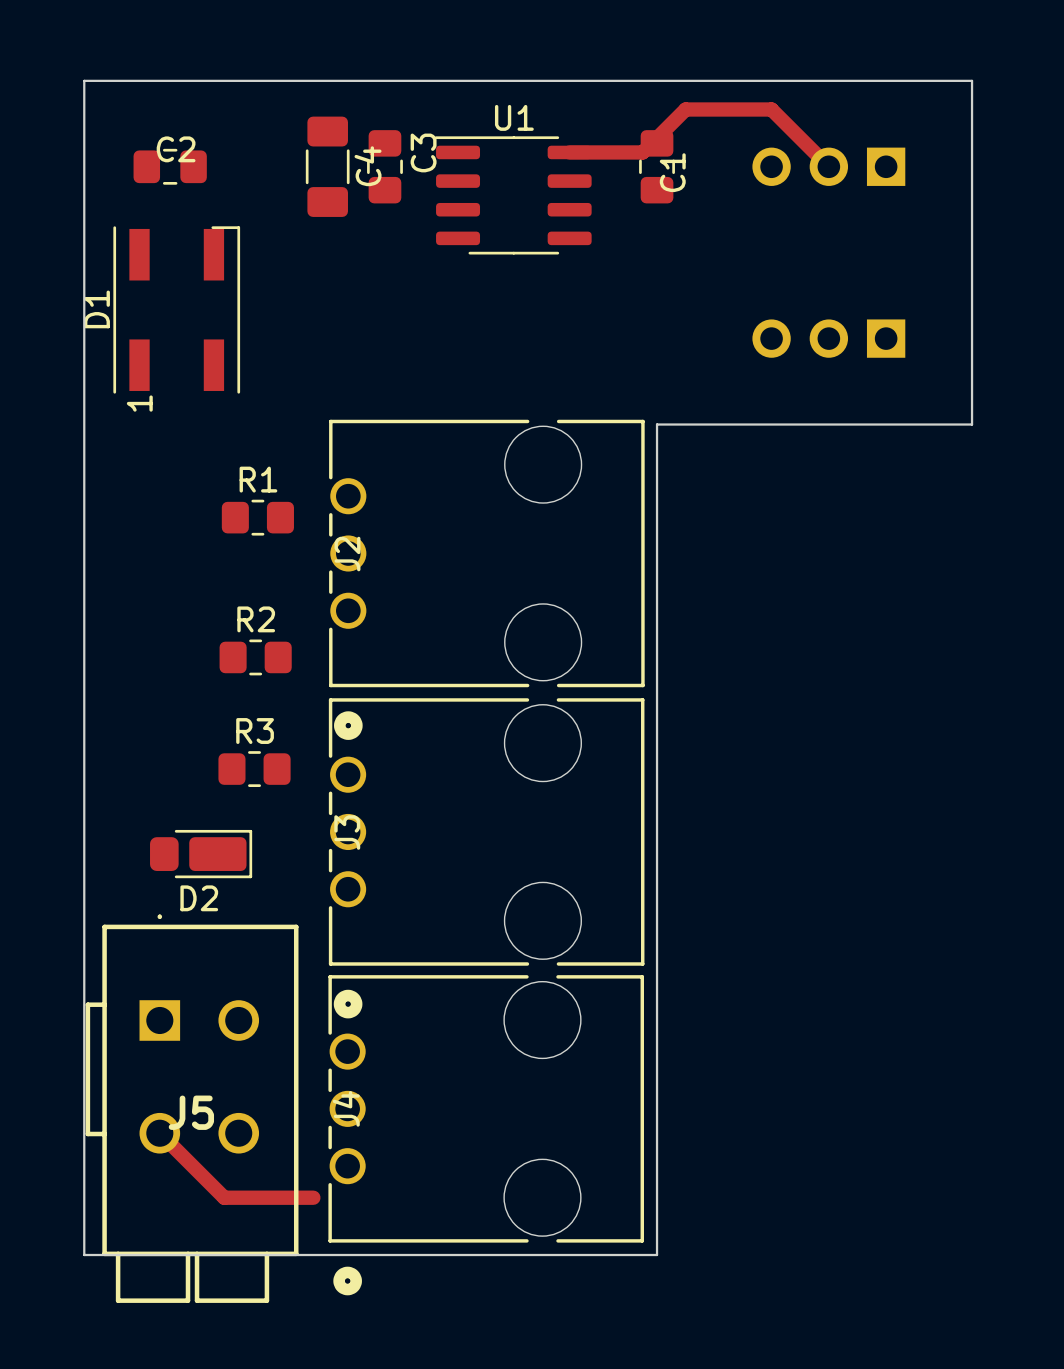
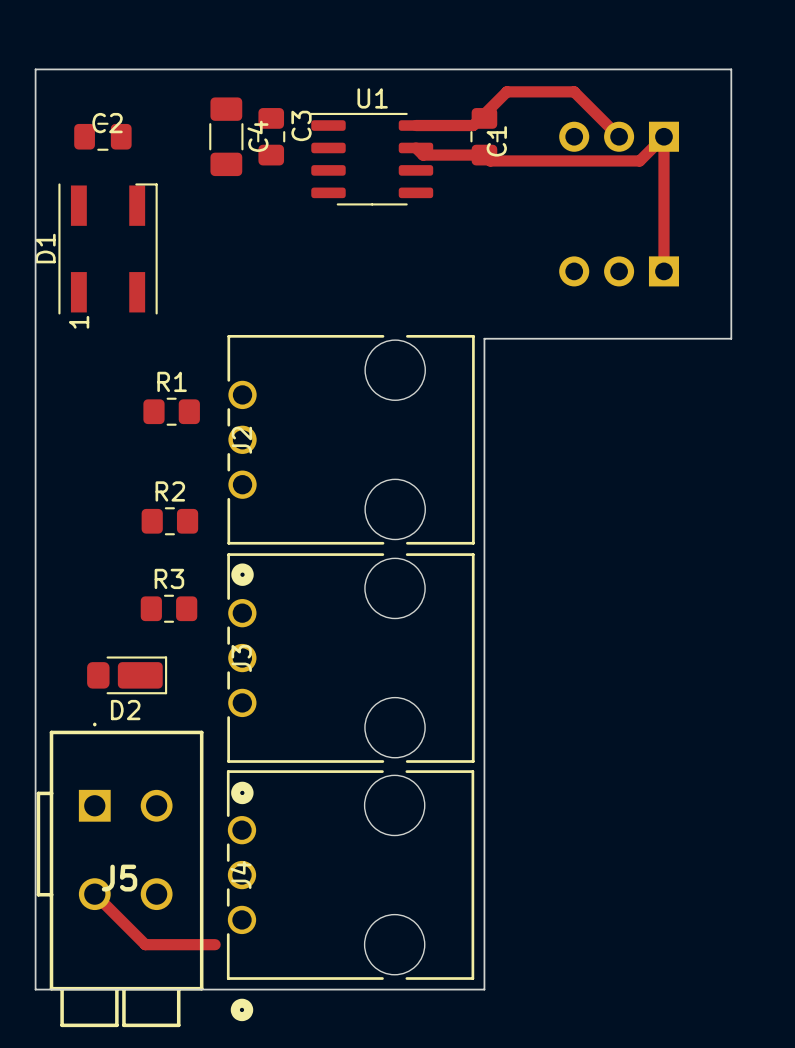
track: none -> (415, 147) (423, 155) (484, 155) (490, 160) (639, 160) (663, 136) (663, 271)

